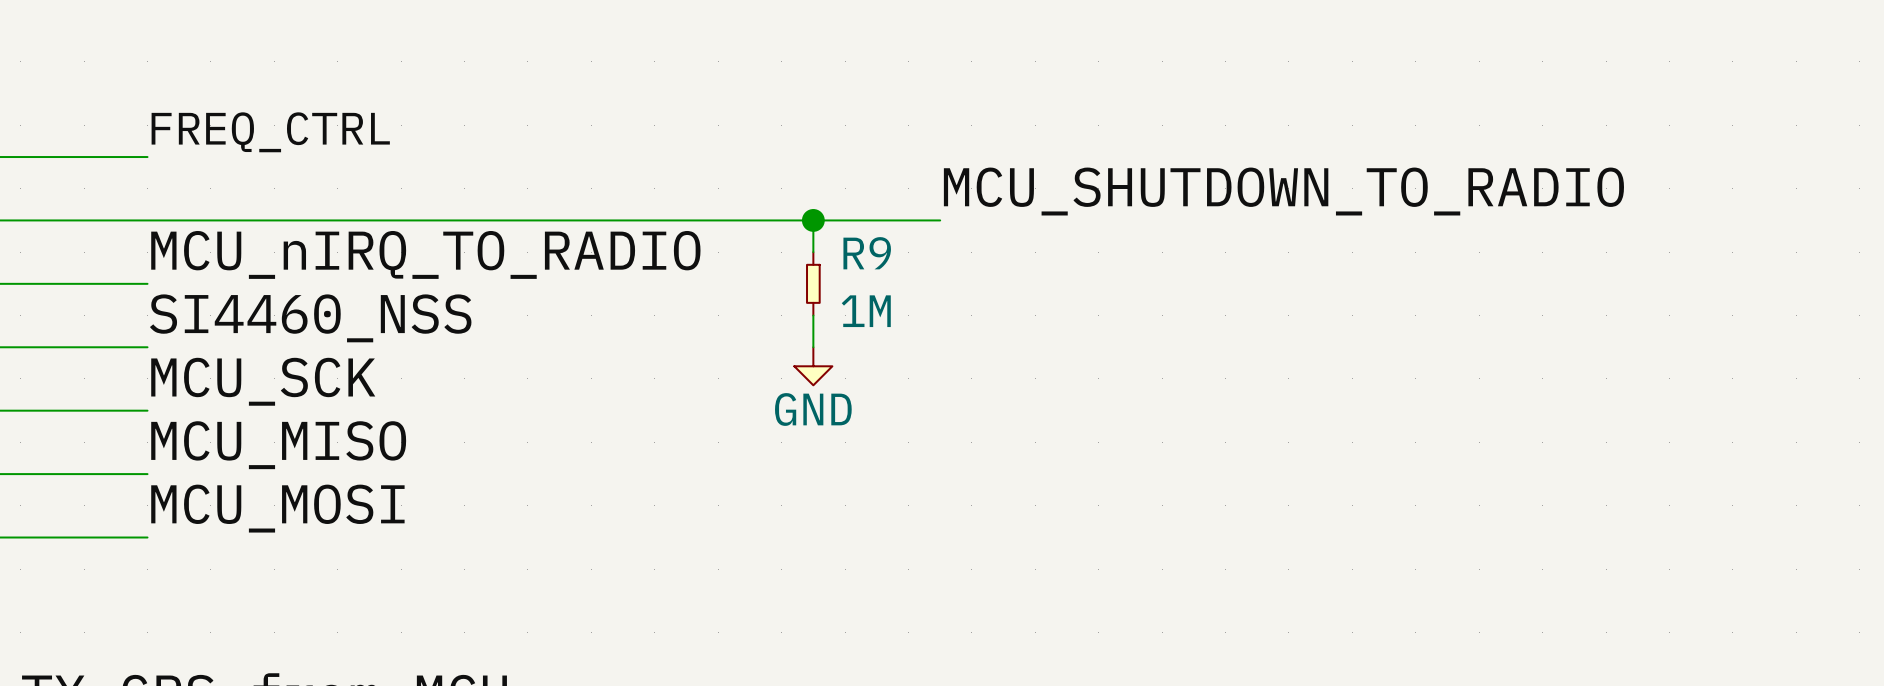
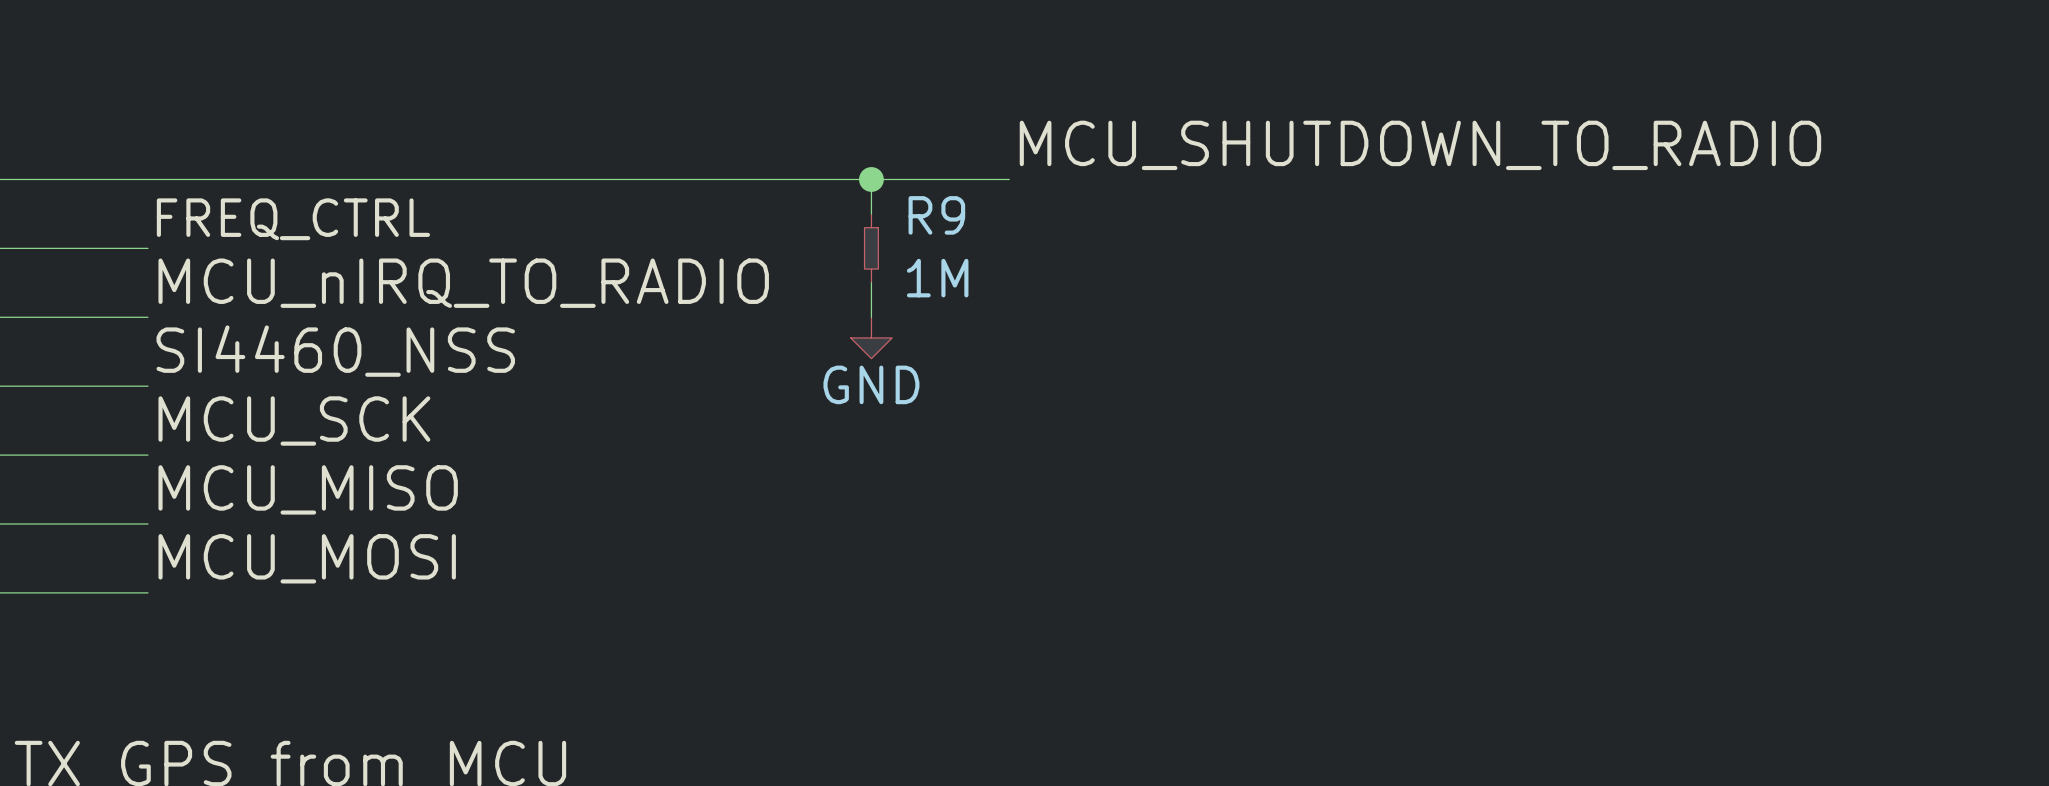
label position: FREQ_CTRL (270, 132) -> FREQ_CTRL (293, 219)
label position: MCU_SHUTDOWN_TO_RADIO (1283, 191) -> MCU_SHUTDOWN_TO_RADIO (1420, 145)
wire: (147, 220) (940, 220) -> (147, 179) (1009, 179)
junction position: (813, 220) -> (871, 179)
R9 position: (813, 283) -> (871, 248)
wire: (813, 315) (813, 347) -> (871, 179) (871, 213)
power symbol position: GND (813, 366) -> GND (871, 337)

